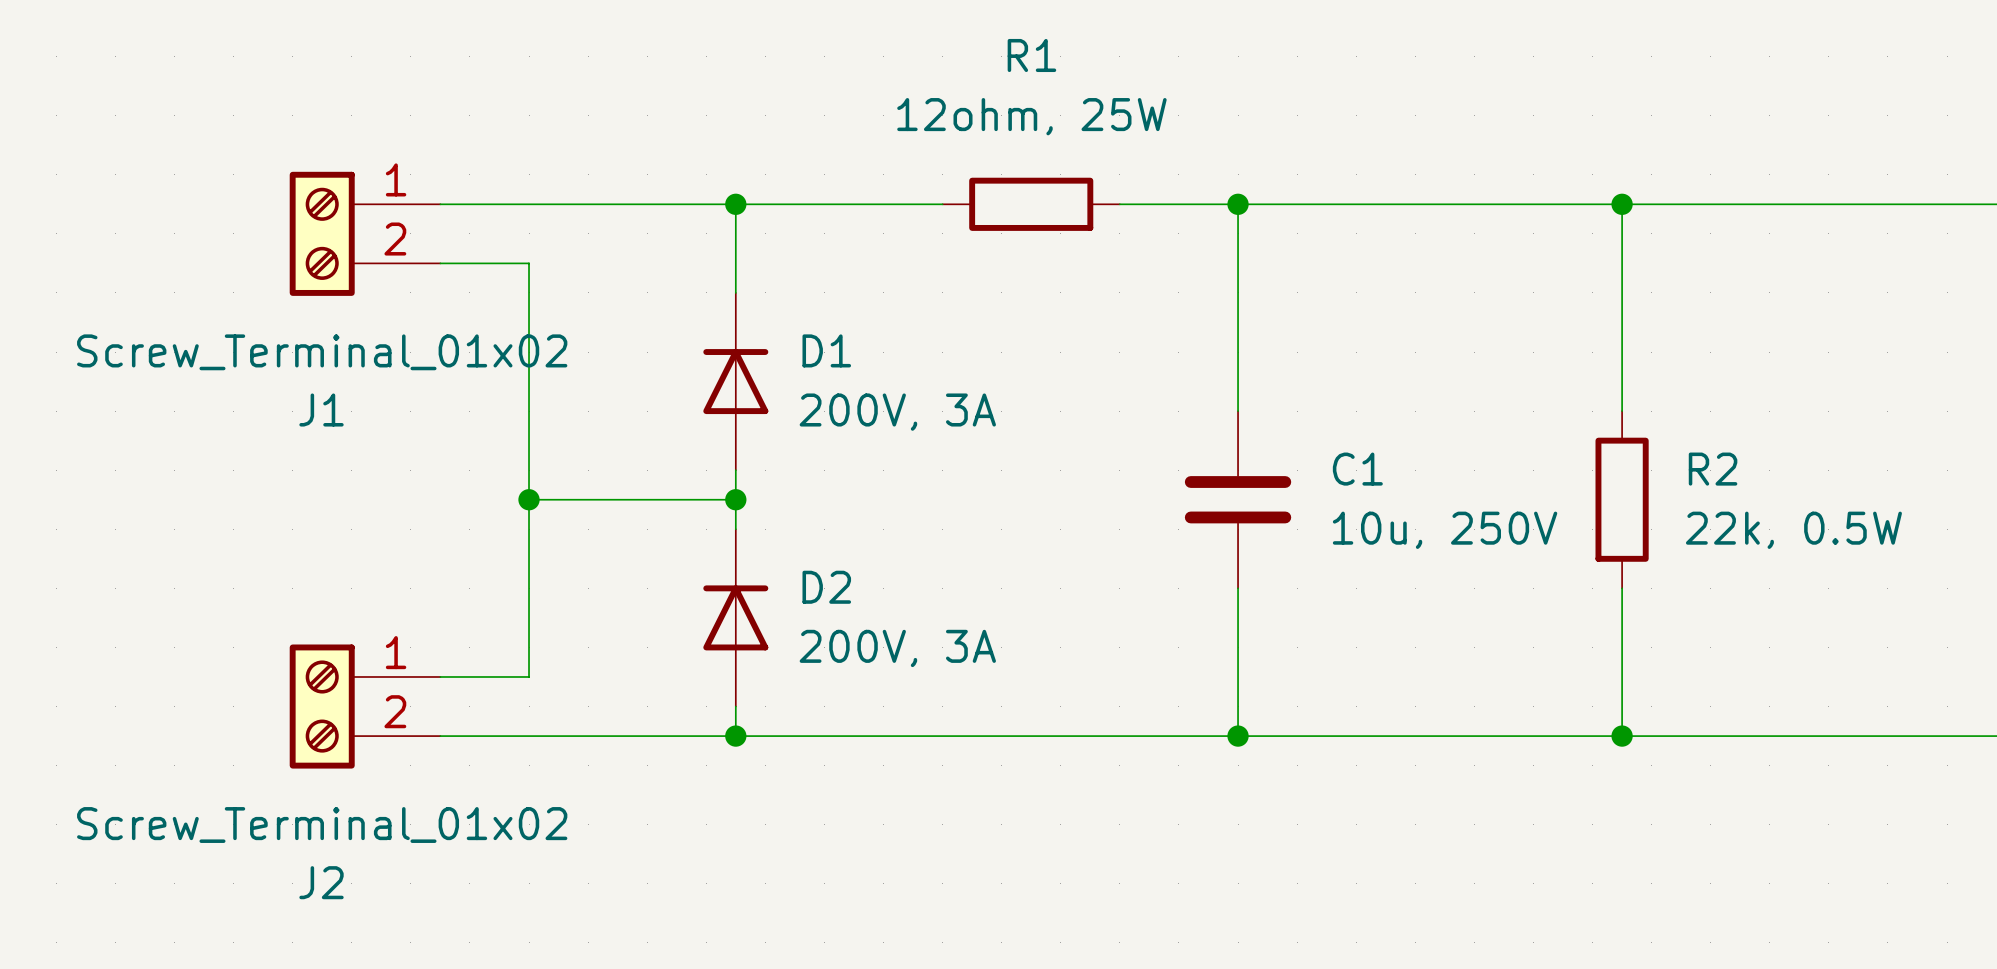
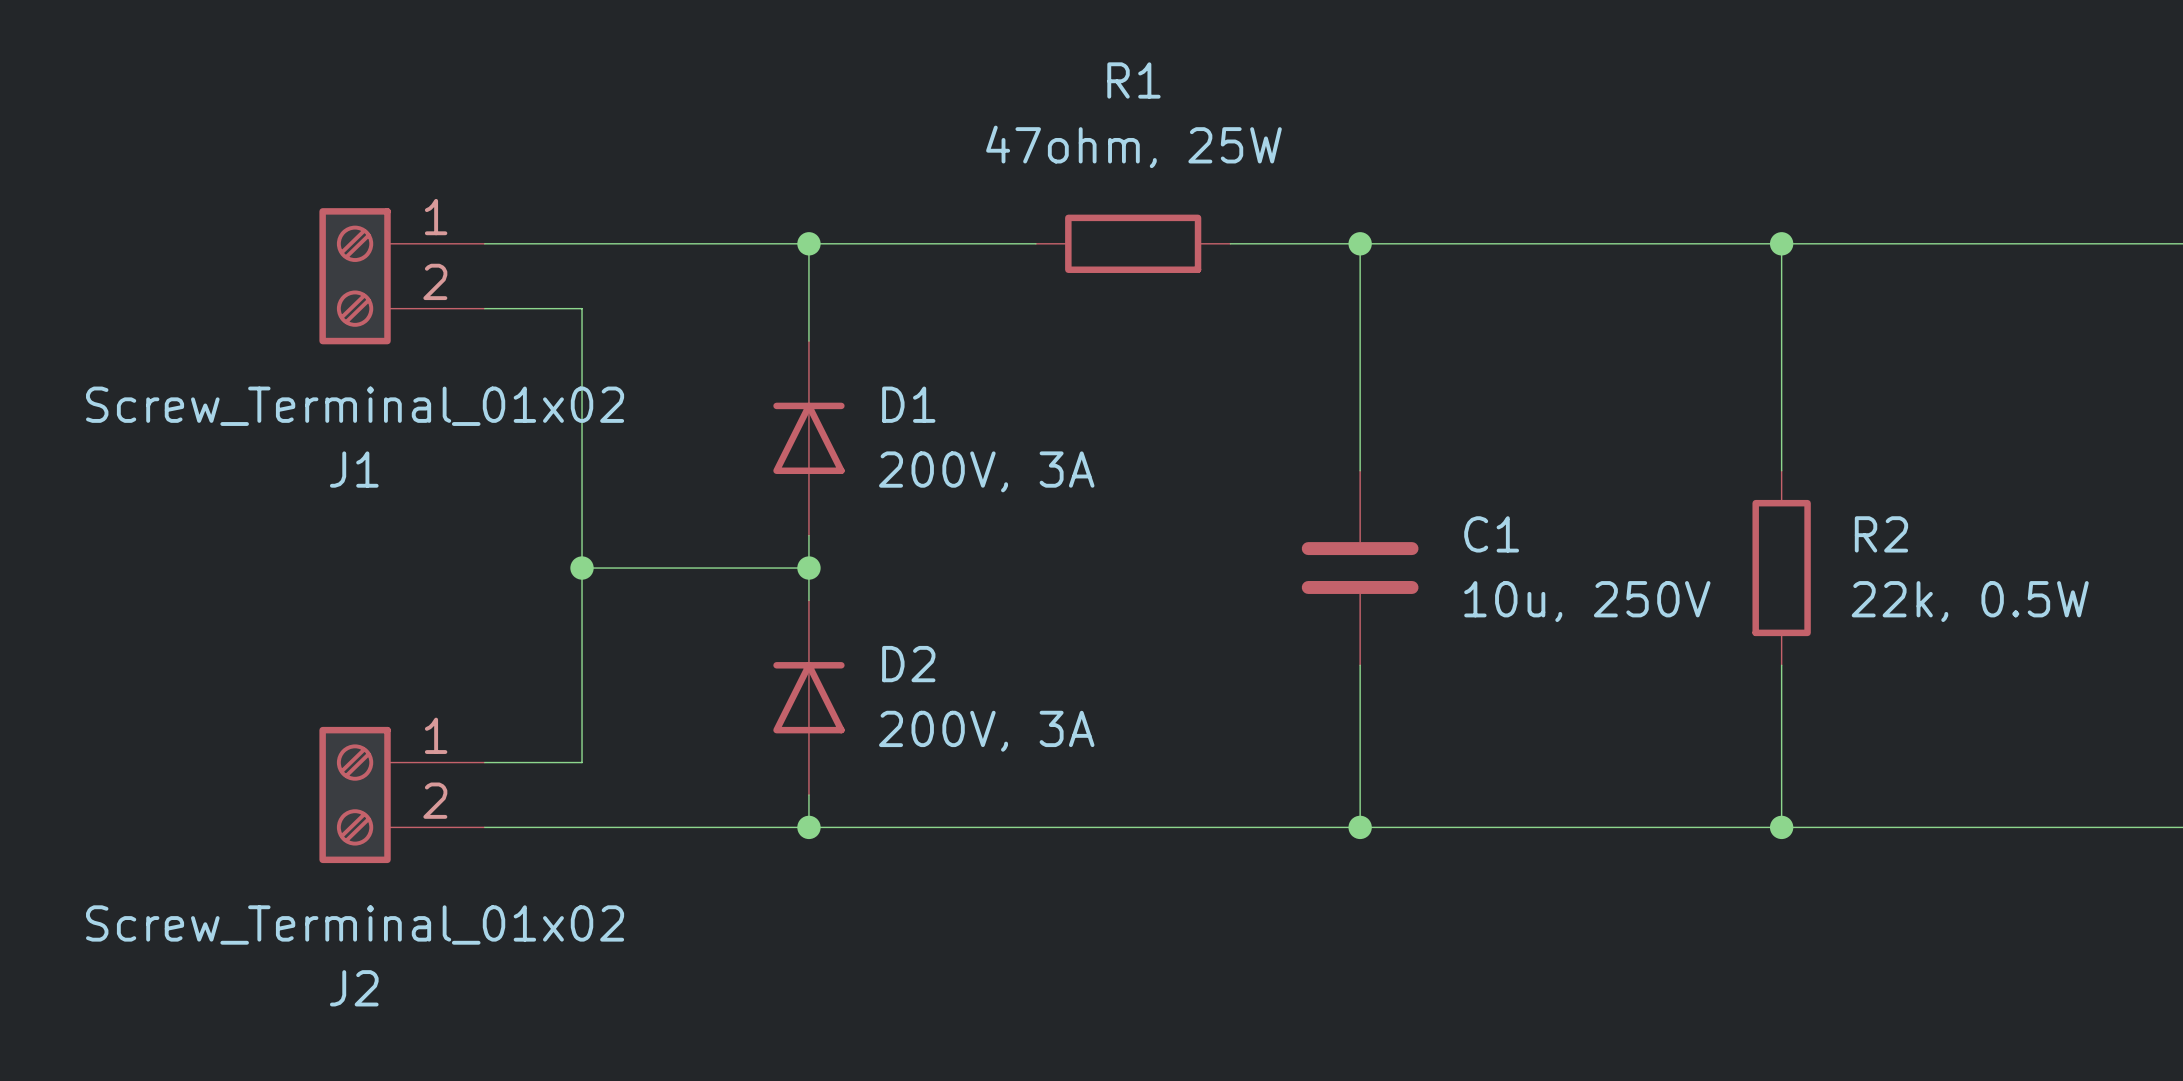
R1 value: 12ohm, 25W (1031, 116) -> 47ohm, 25W (1133, 146)

